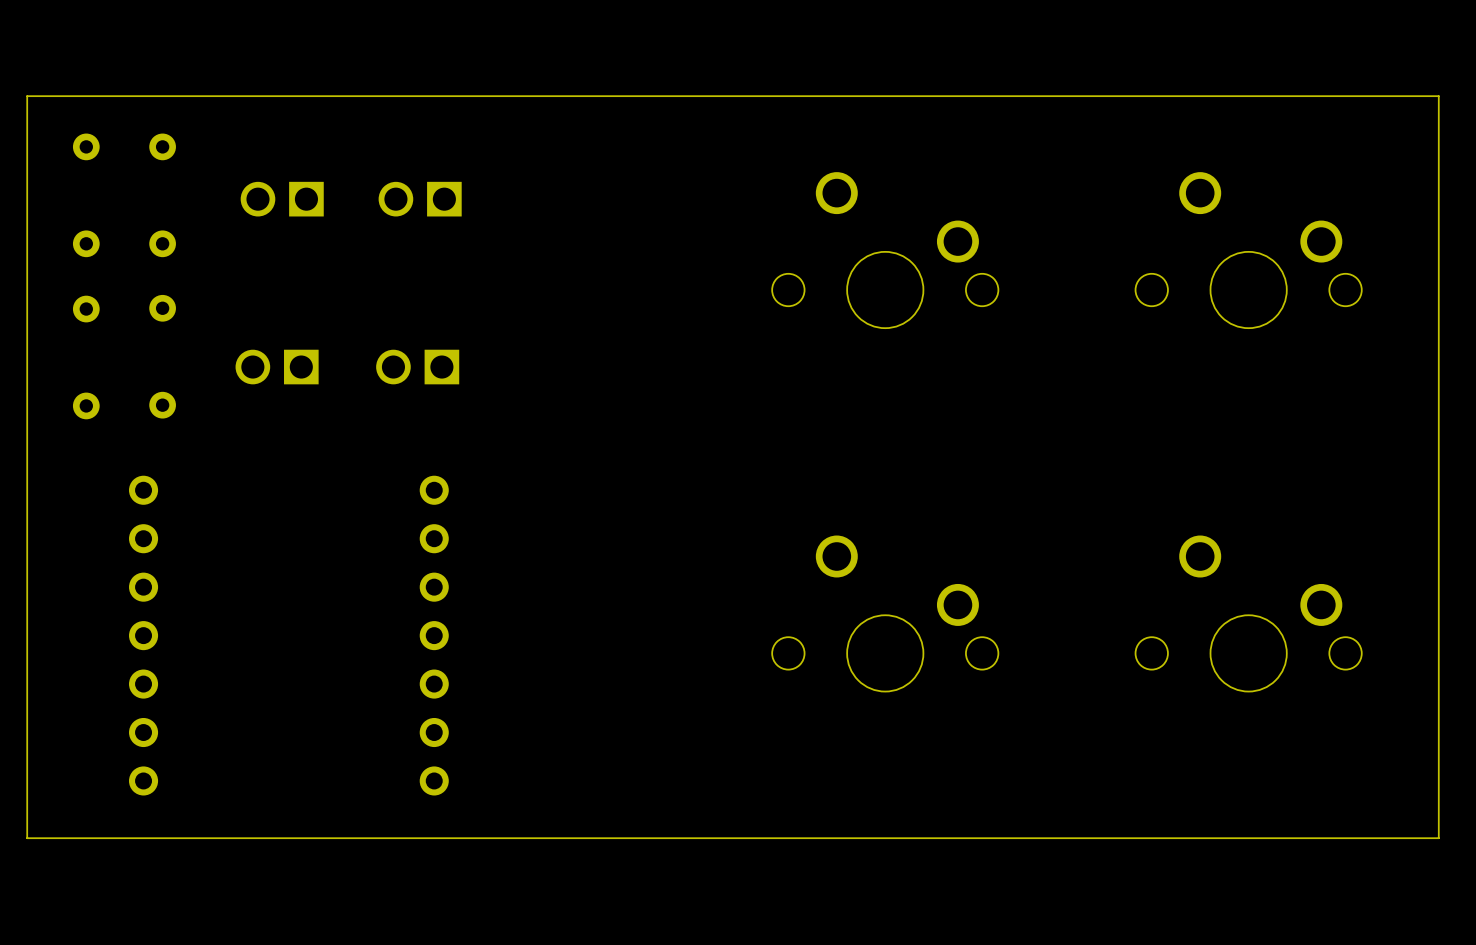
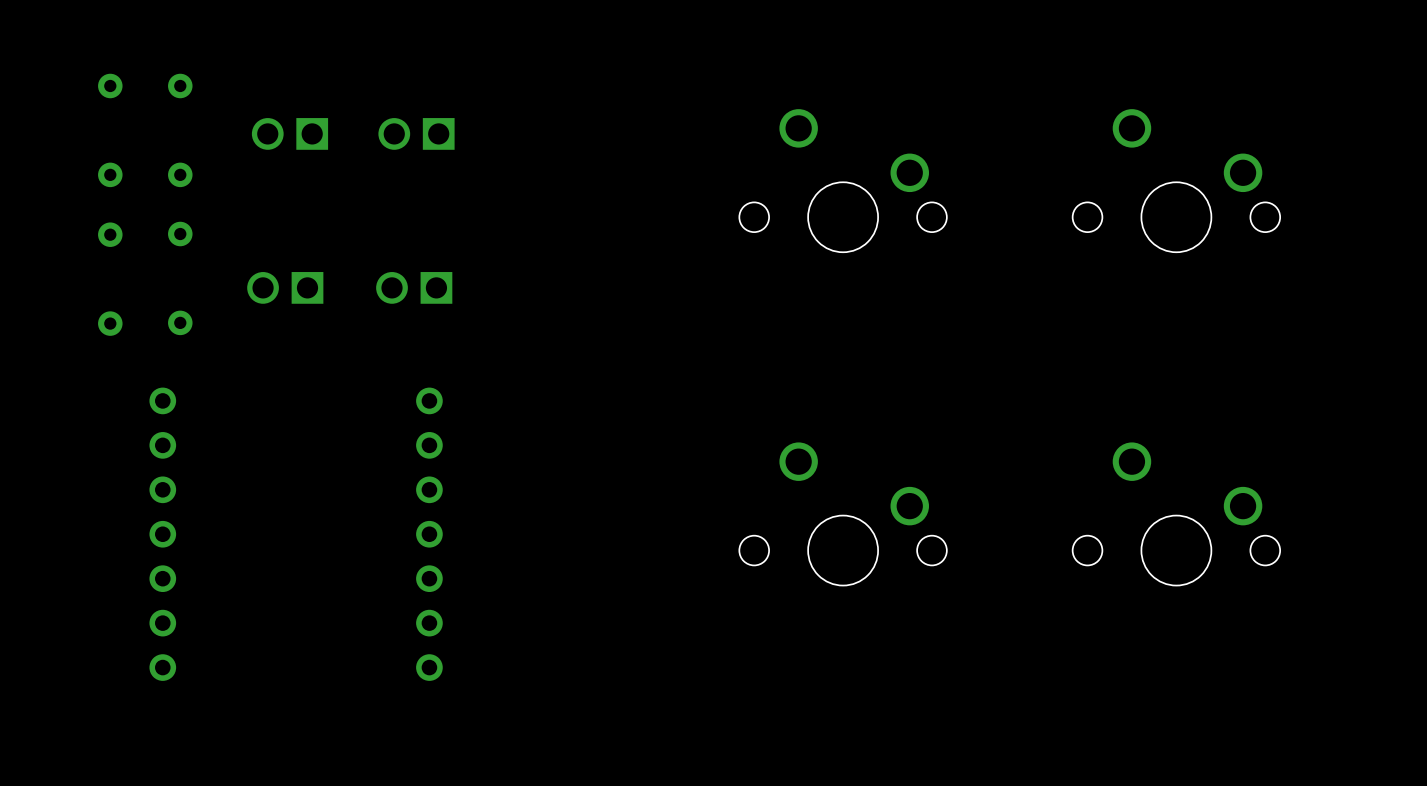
board edge: (1438, 96) (27, 96) (27, 838) (1438, 838) (1438, 96) -> none

